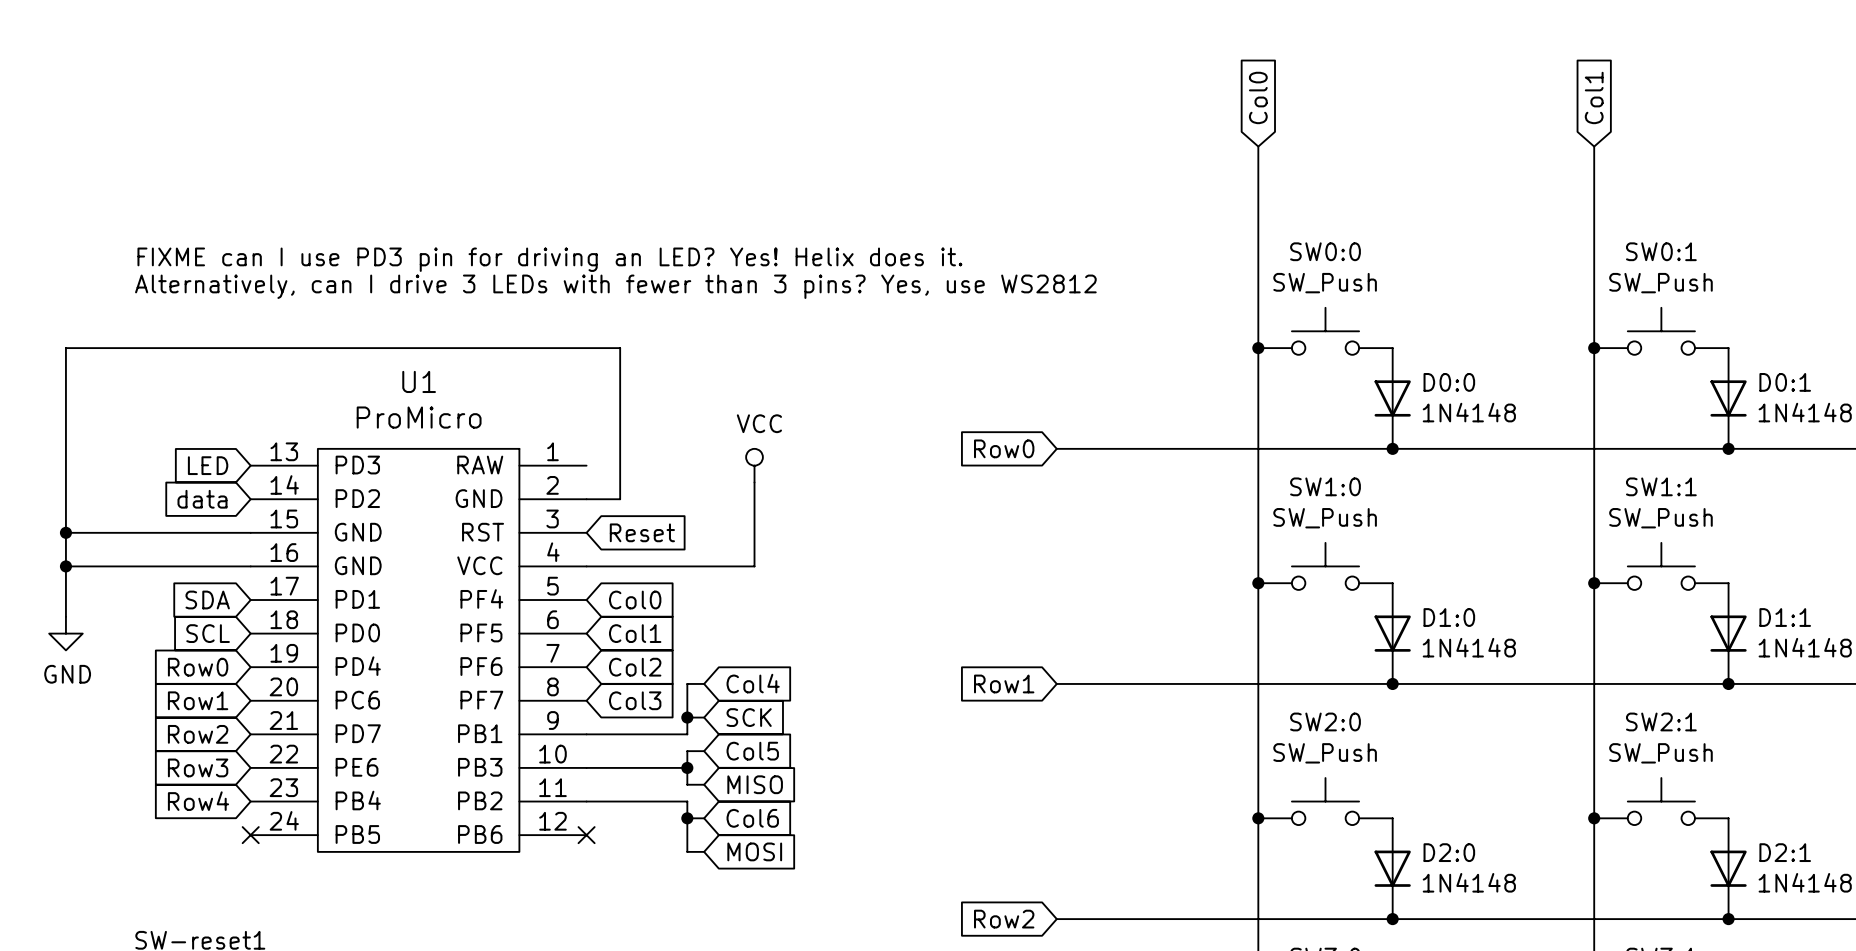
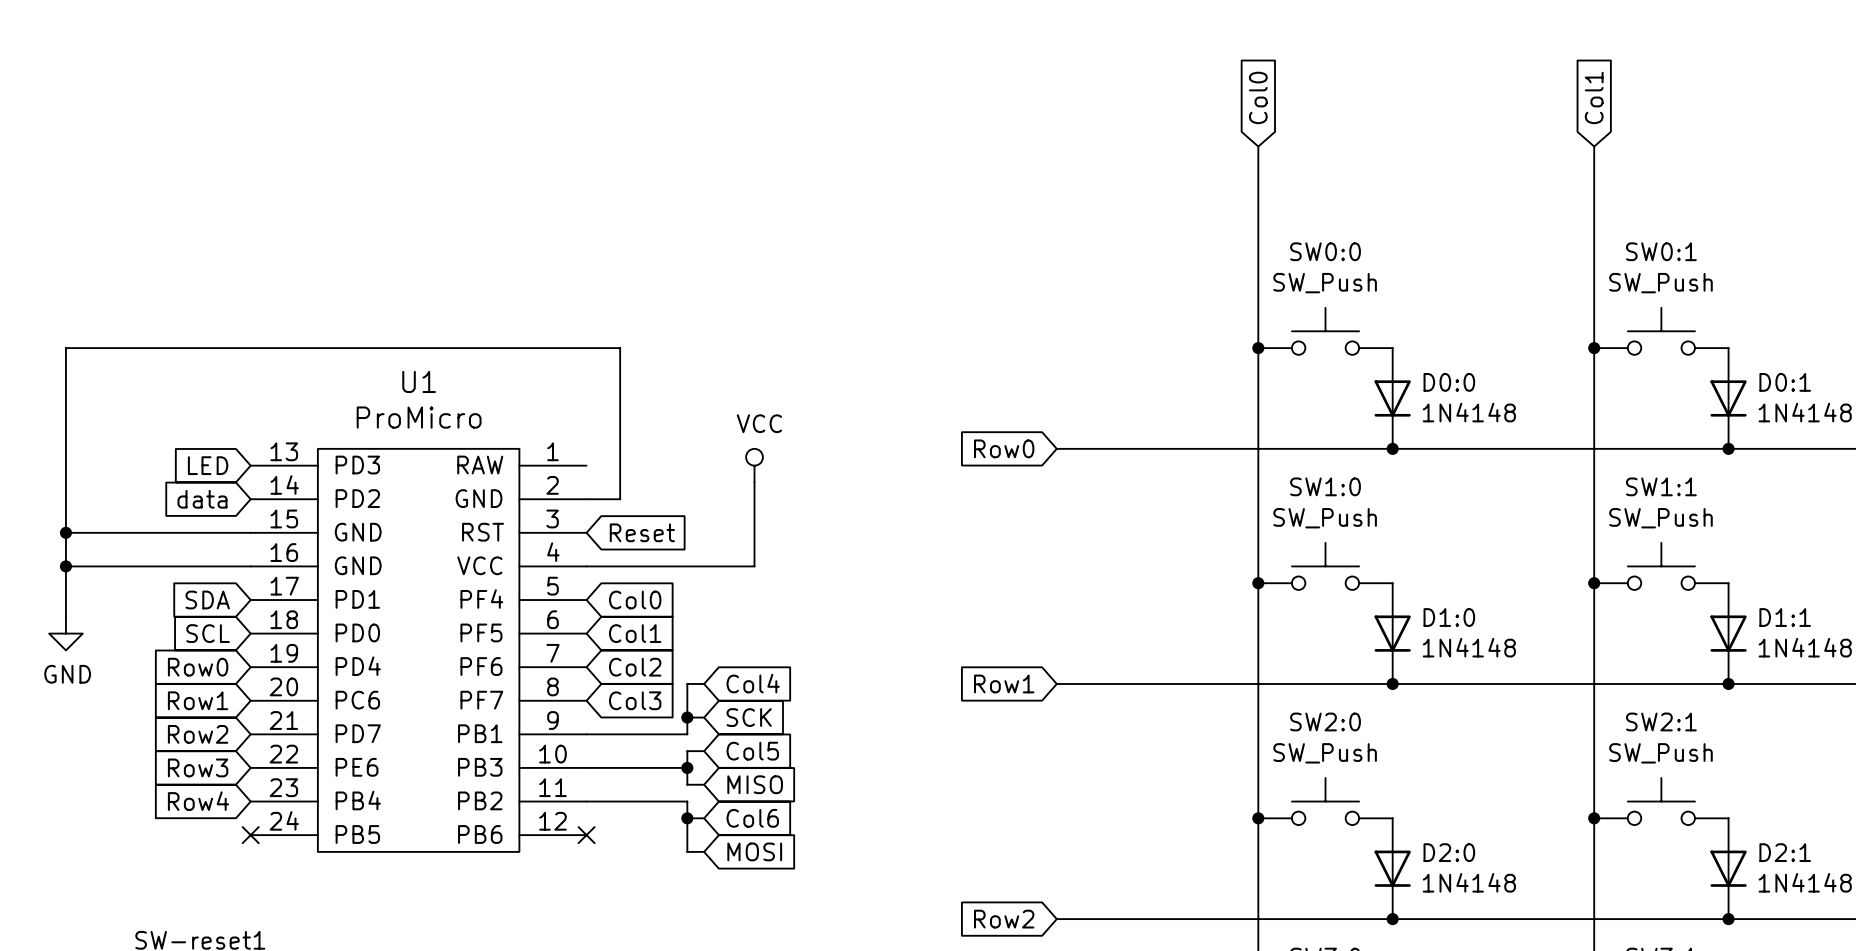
text: FIXME can I use PD3 pin for driving an LED? Yes! Helix does it. (549, 259) -> none
text: Alternatively, can I drive 3 LEDs with fewer than 3 pins? Yes, use WS2812 (615, 286) -> none

